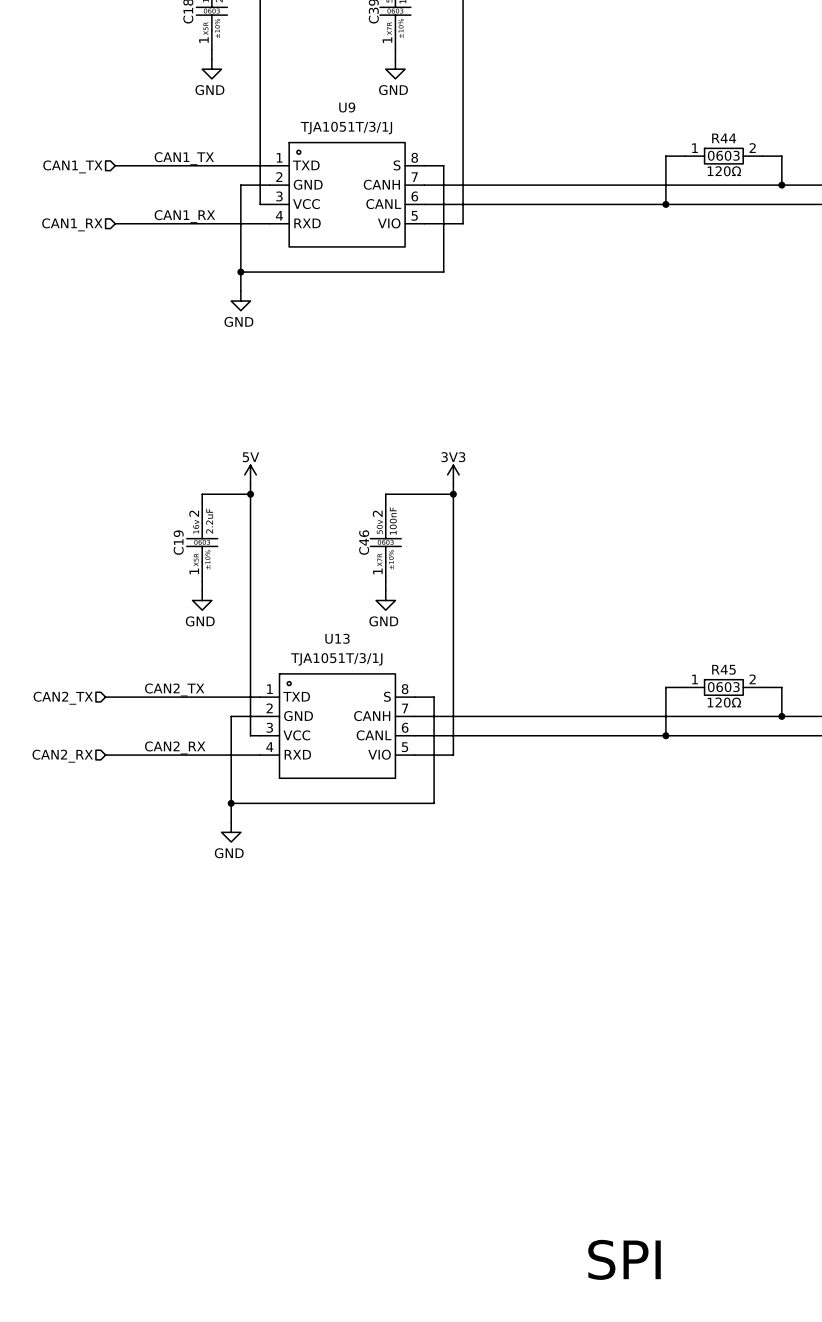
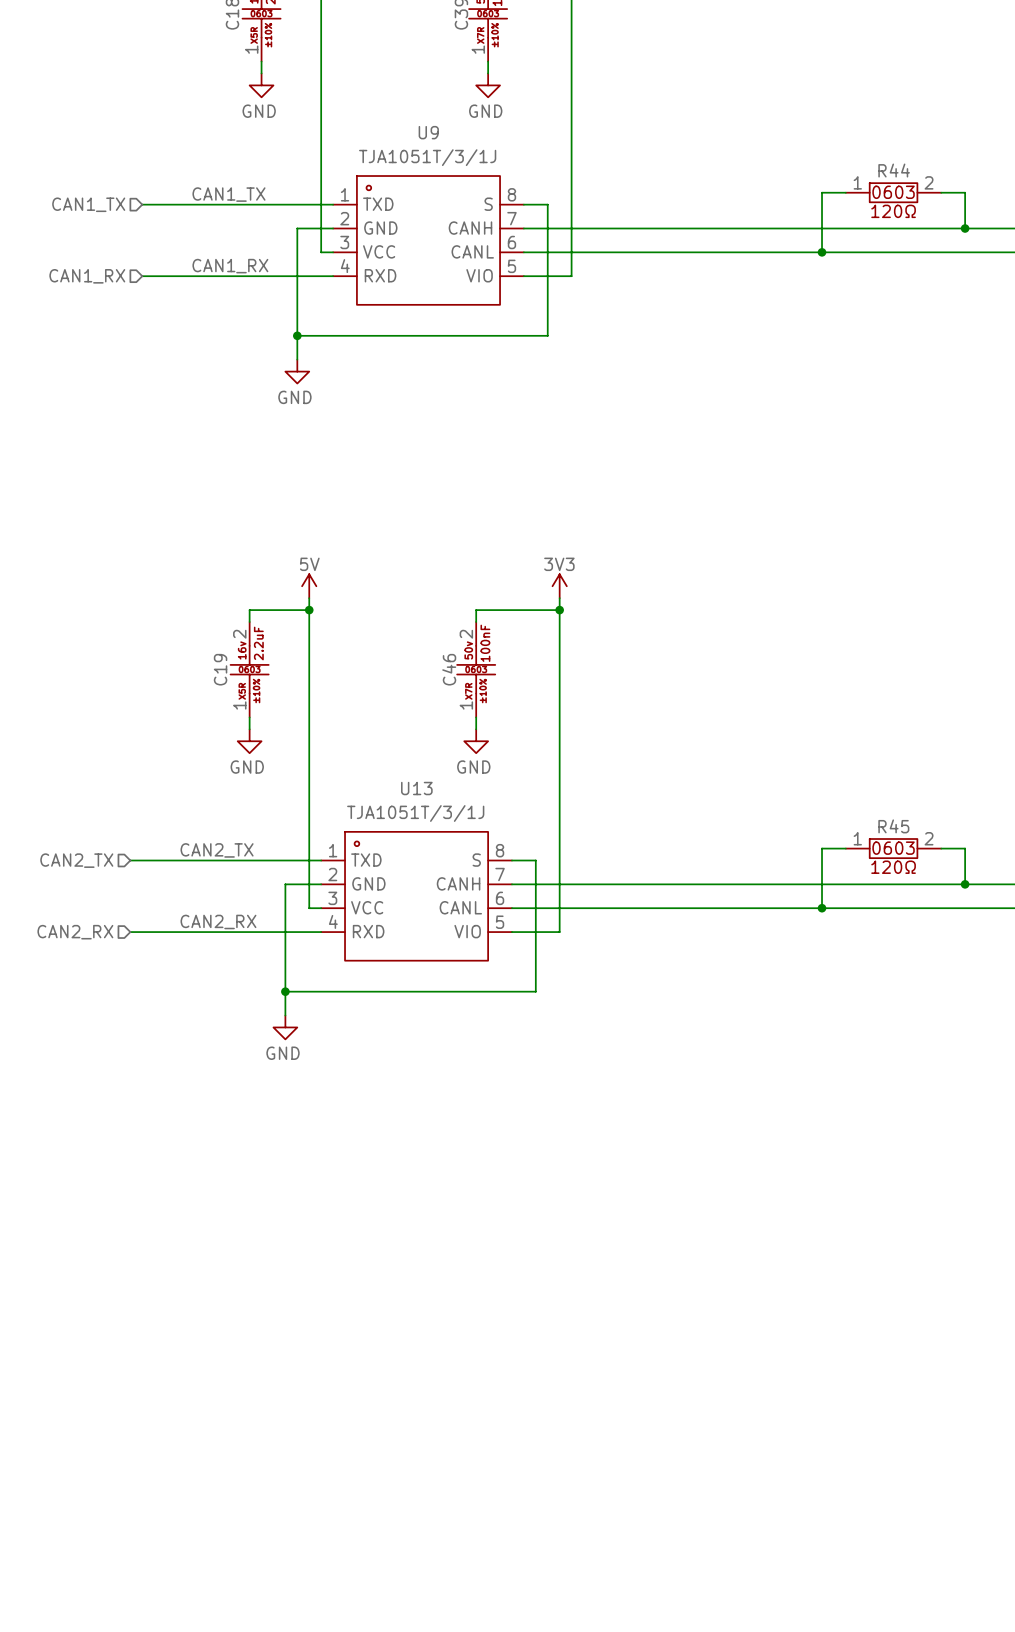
text: SPI (624, 1259) -> none

